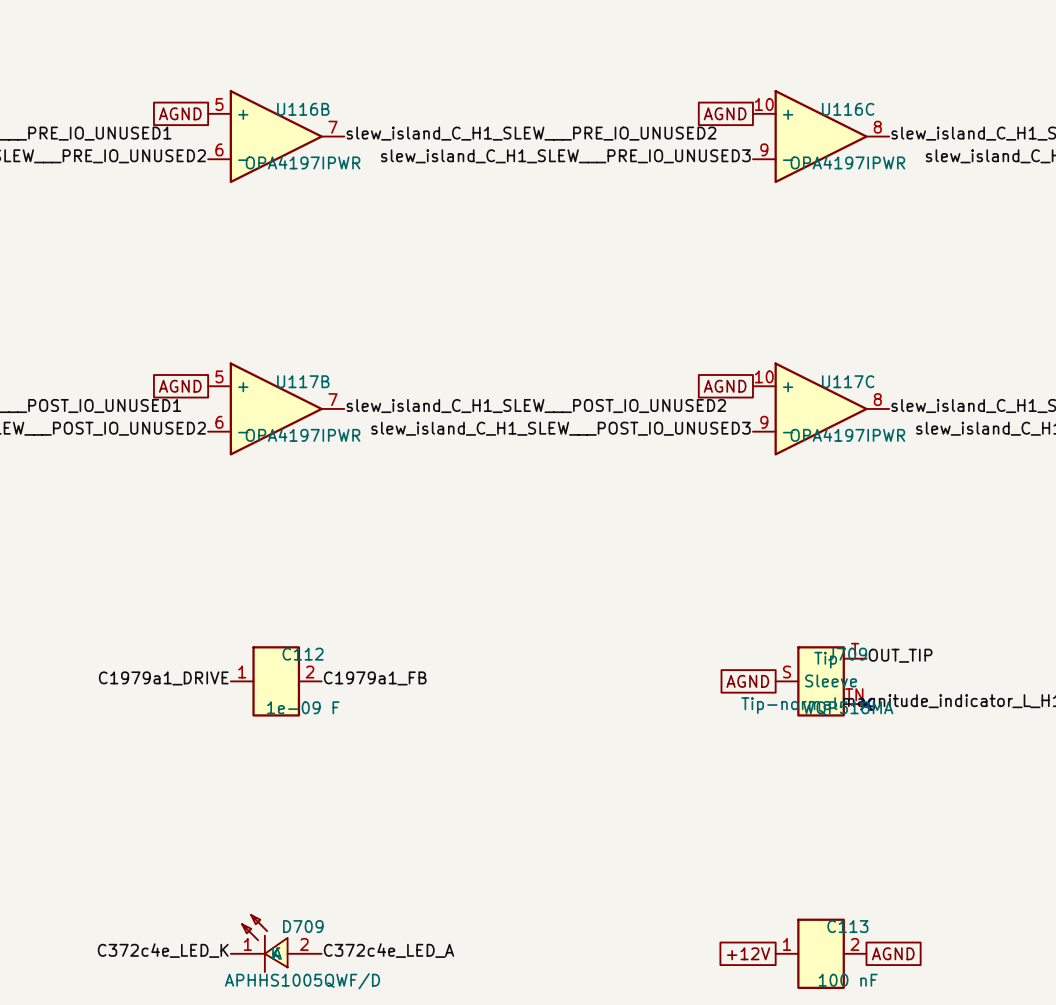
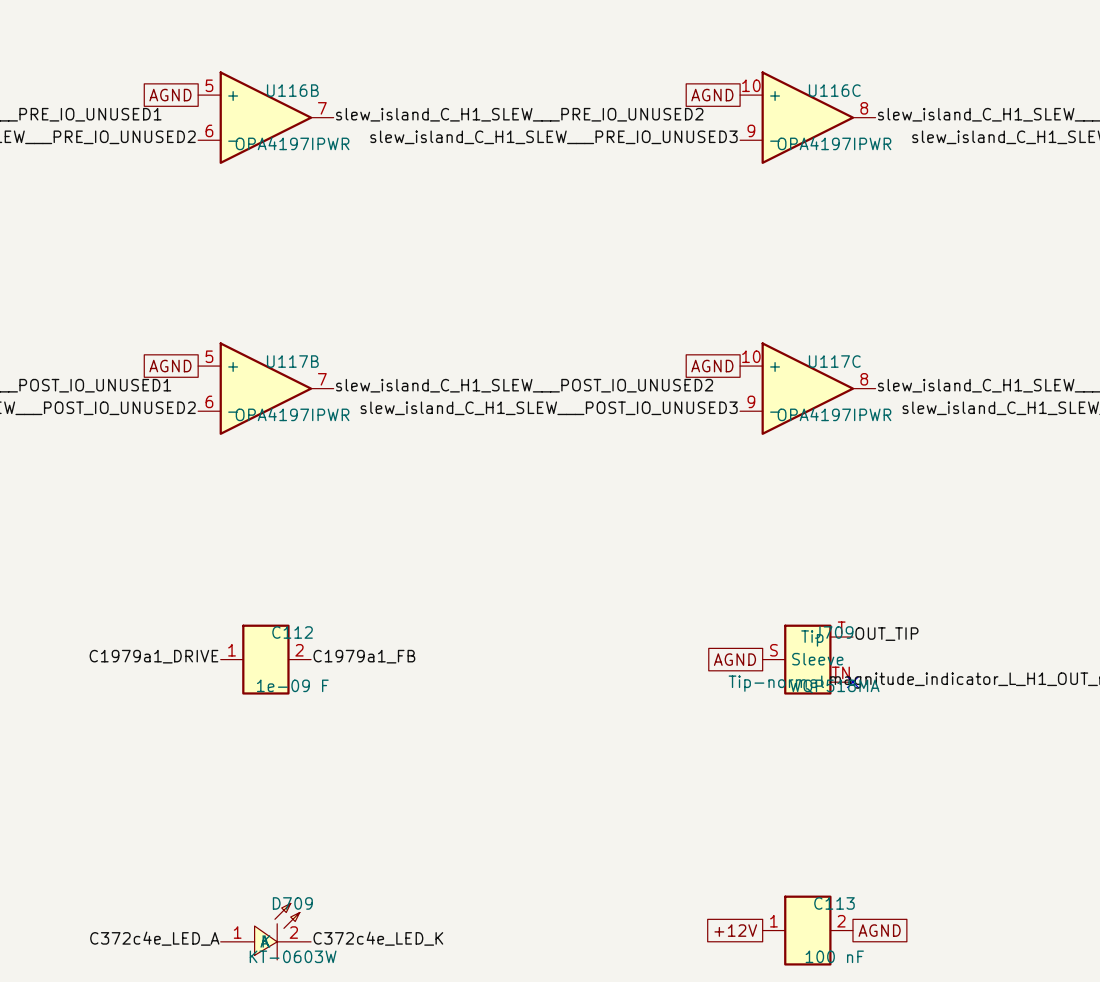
D709 symbol: [230, 915, 322, 972] -> [220, 903, 312, 960]
label position: C372c4e_LED_K (163, 950) -> C372c4e_LED_K (378, 938)
label position: C372c4e_LED_A (389, 950) -> C372c4e_LED_A (154, 938)
D709 value: APHHS1005QWF/D (302, 981) -> KT-0603W (293, 956)

